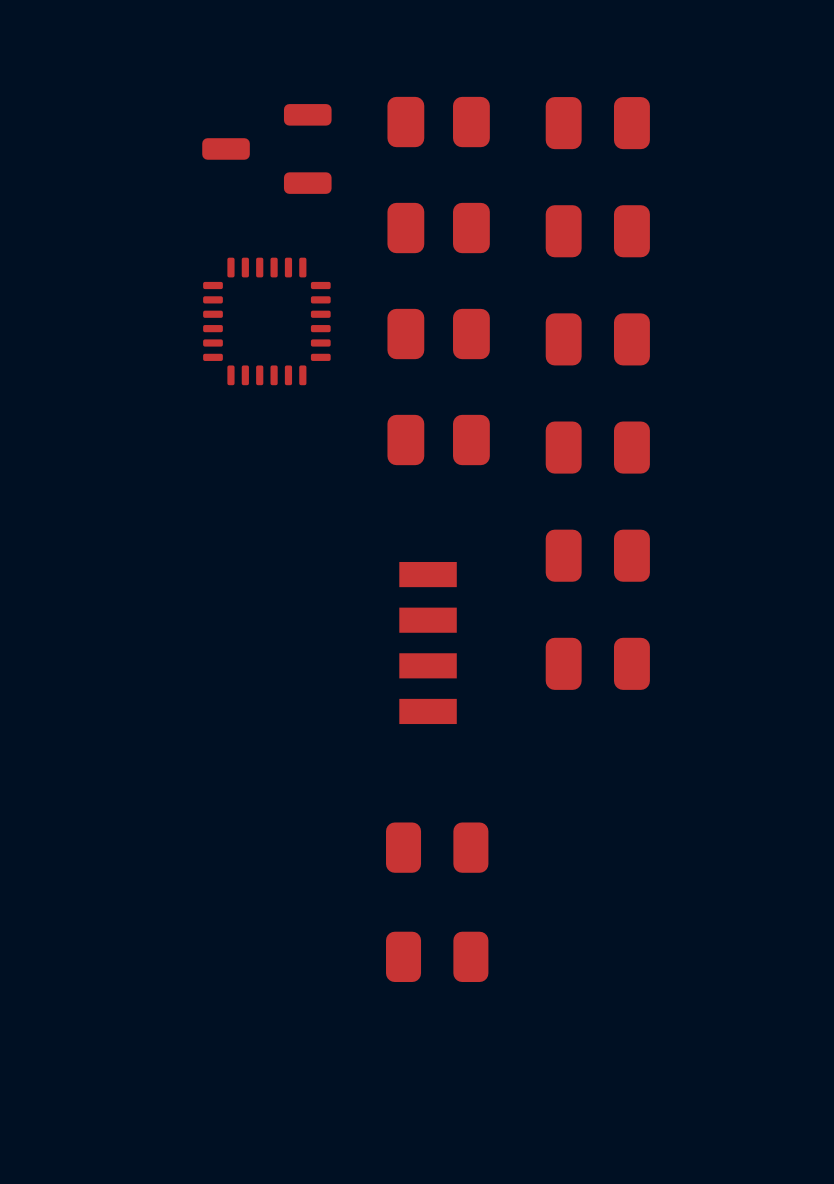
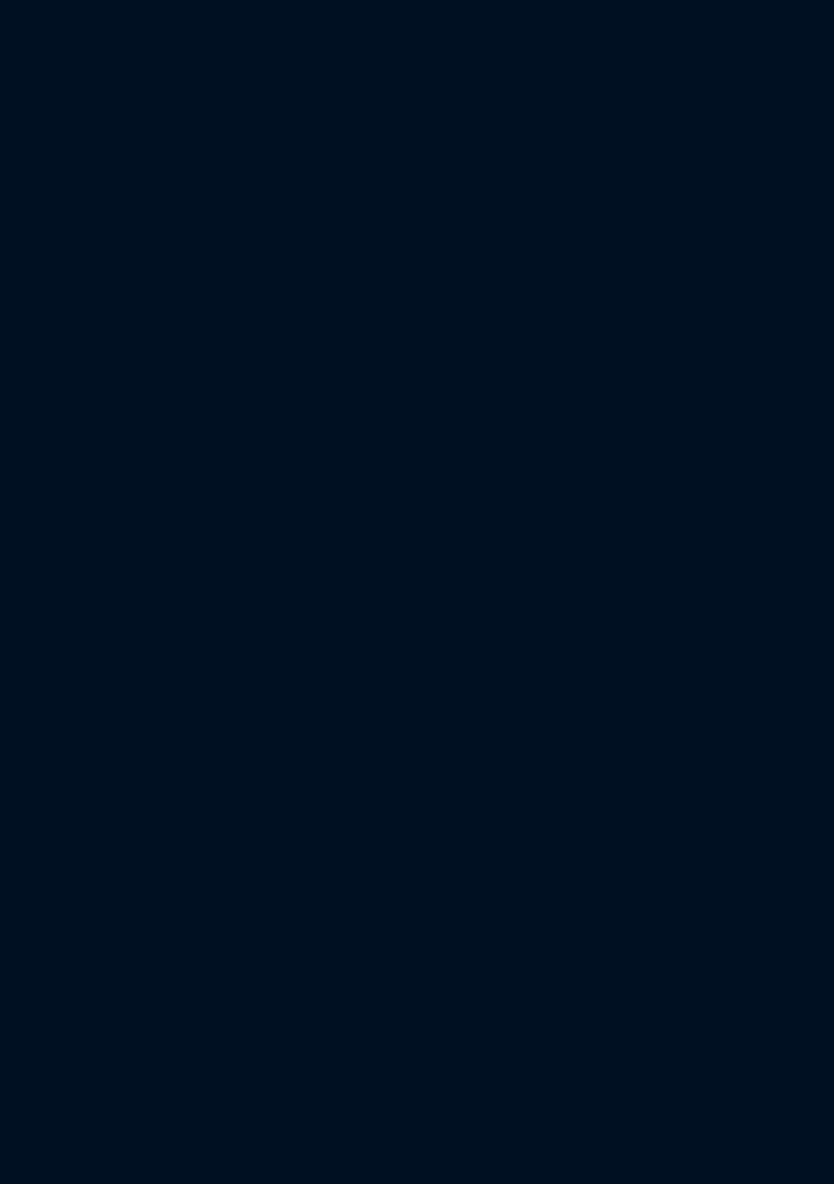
part: (438, 122) -> none
part: (597, 123) -> none
part: (266, 148) -> none
part: (438, 228) -> none
part: (597, 231) -> none
part: (266, 321) -> none
part: (438, 334) -> none
part: (597, 339) -> none
part: (438, 440) -> none
part: (597, 447) -> none
part: (597, 555) -> none
part: (428, 643) -> none
part: (597, 663) -> none
part: (437, 847) -> none
part: (437, 956) -> none

